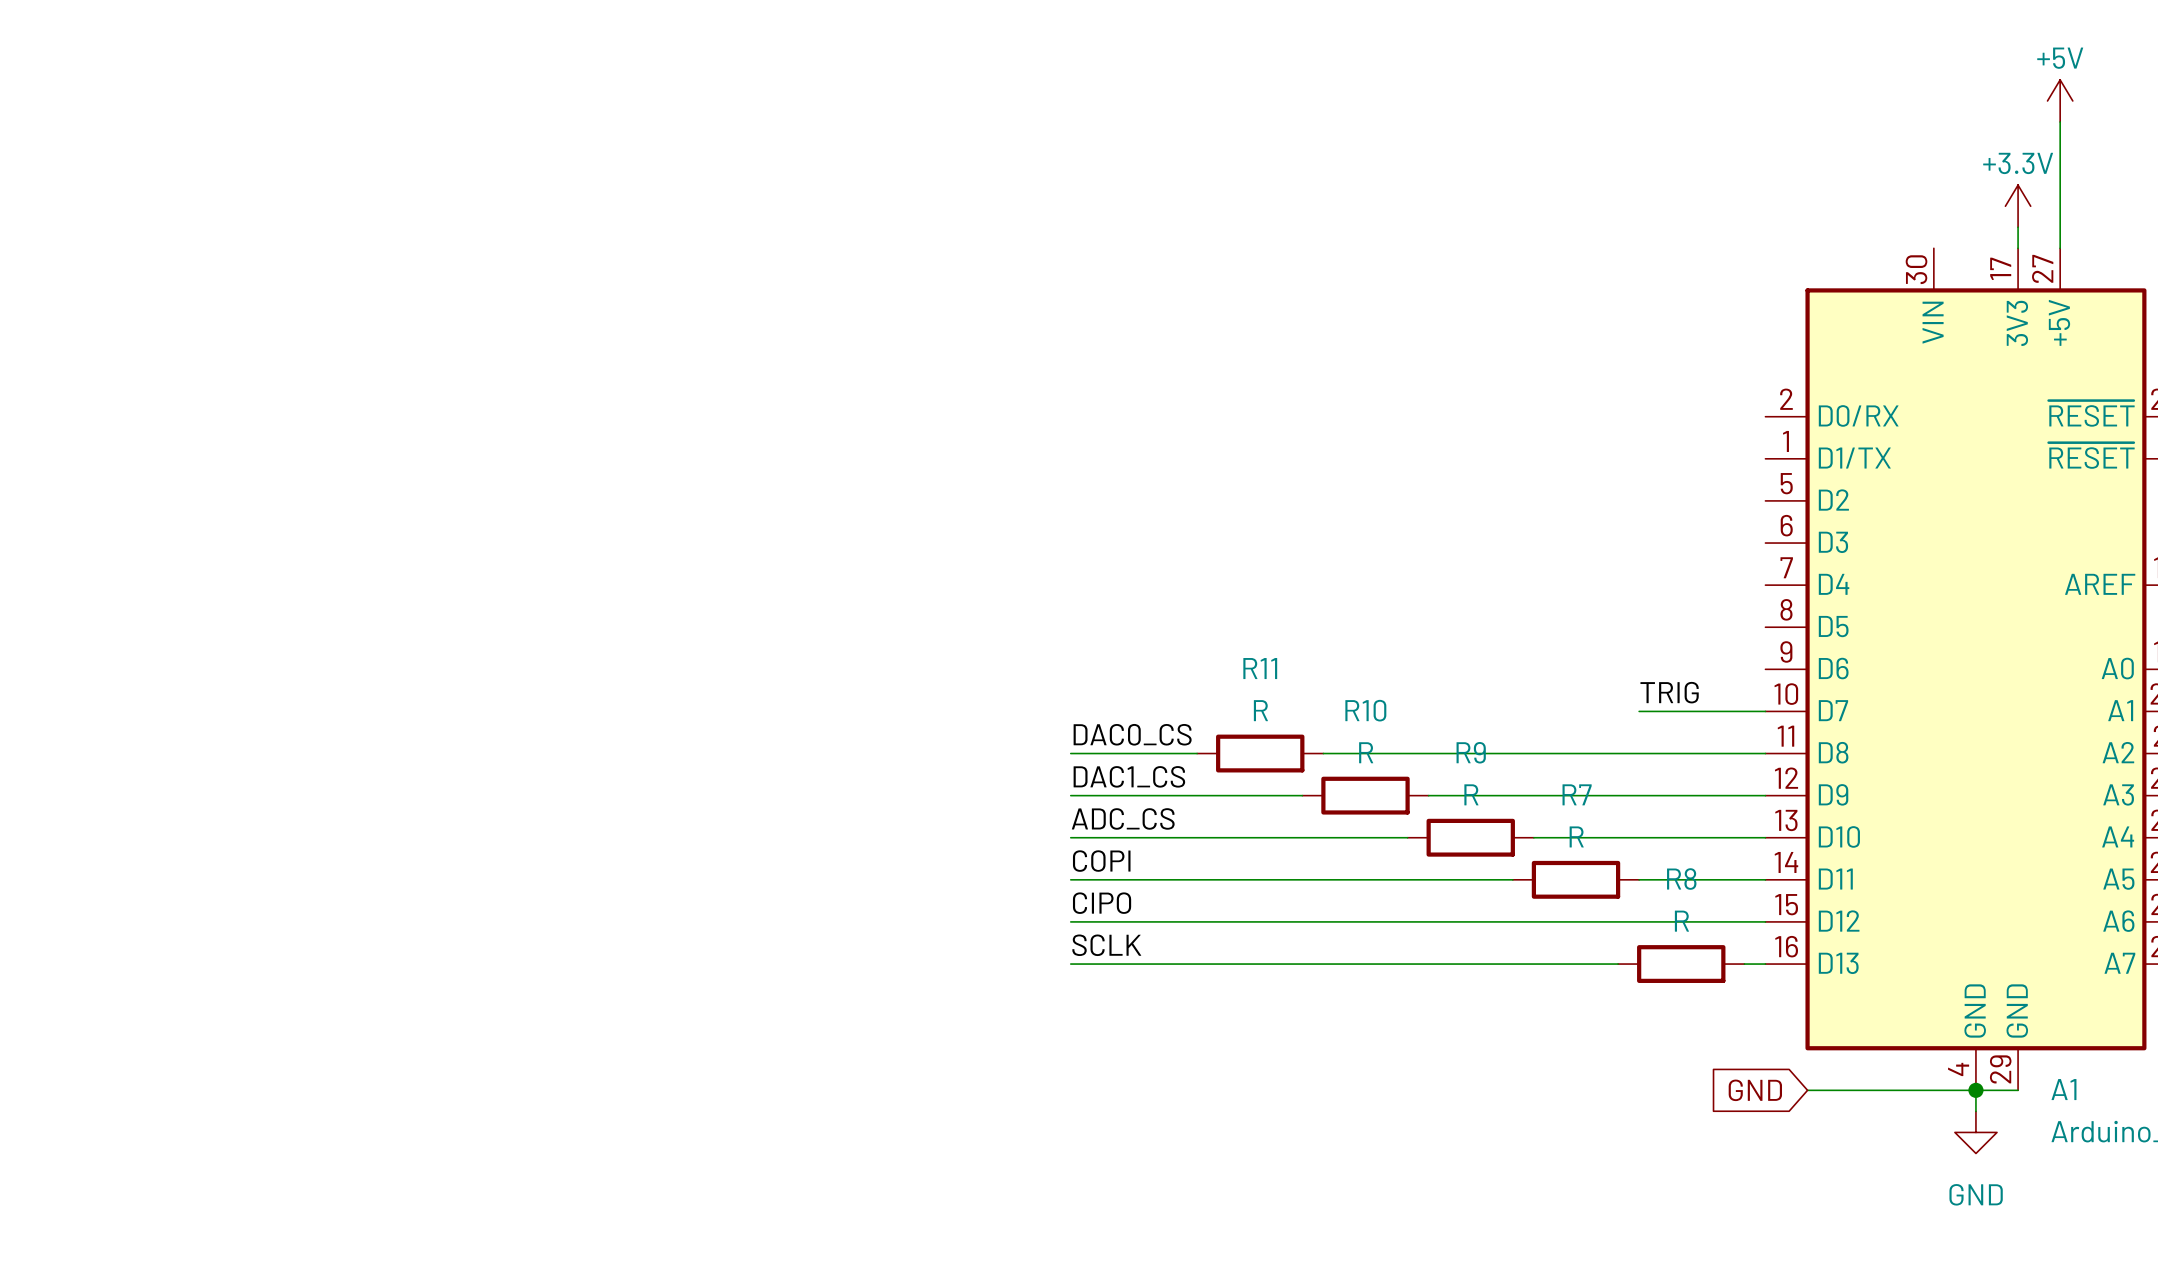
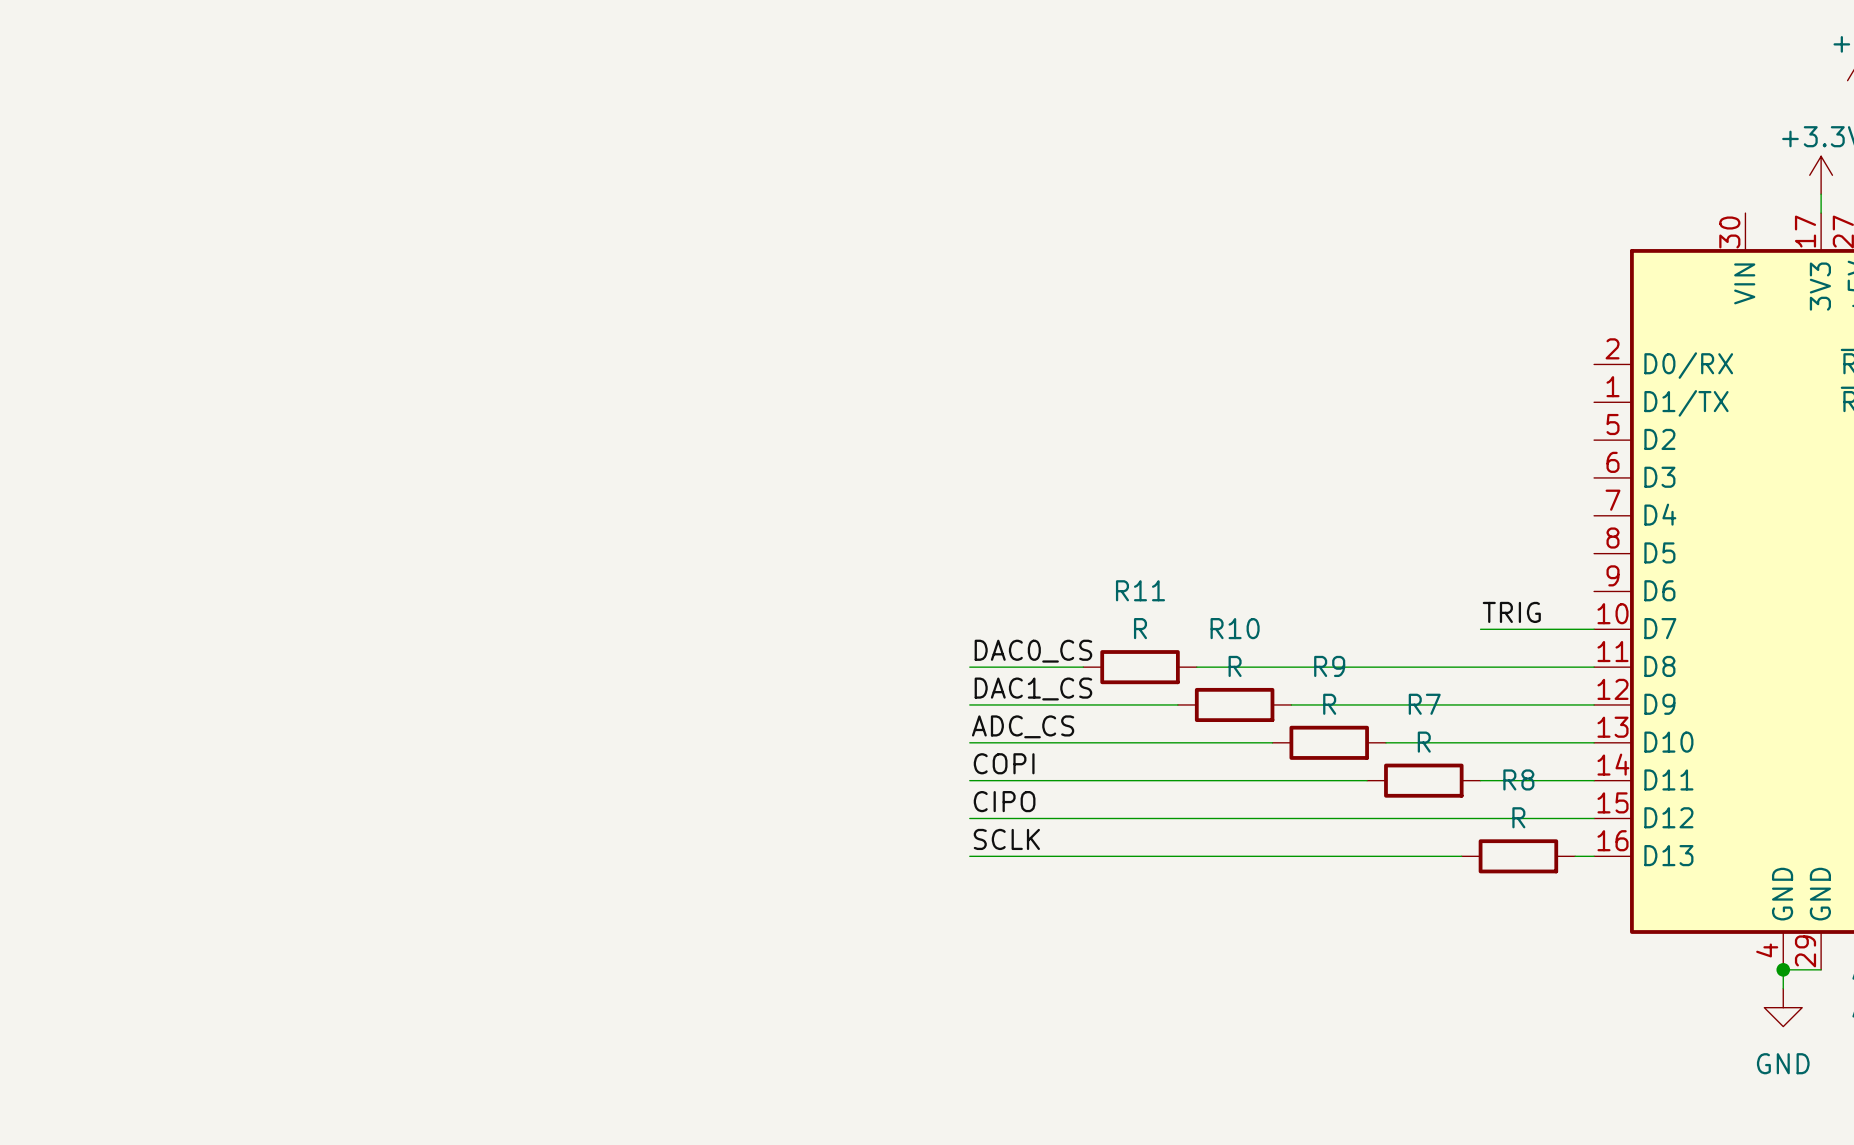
global label: GND (1755, 1090) -> none
wire: (1807, 1090) (1975, 1090) -> none

